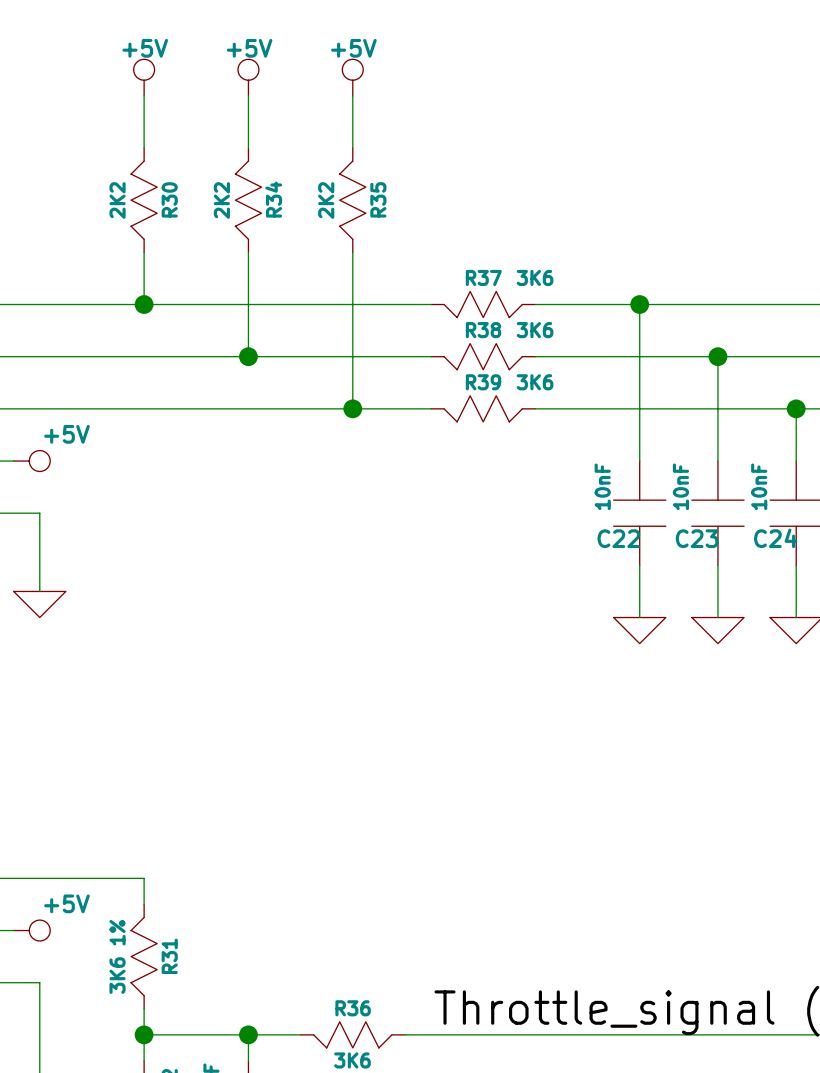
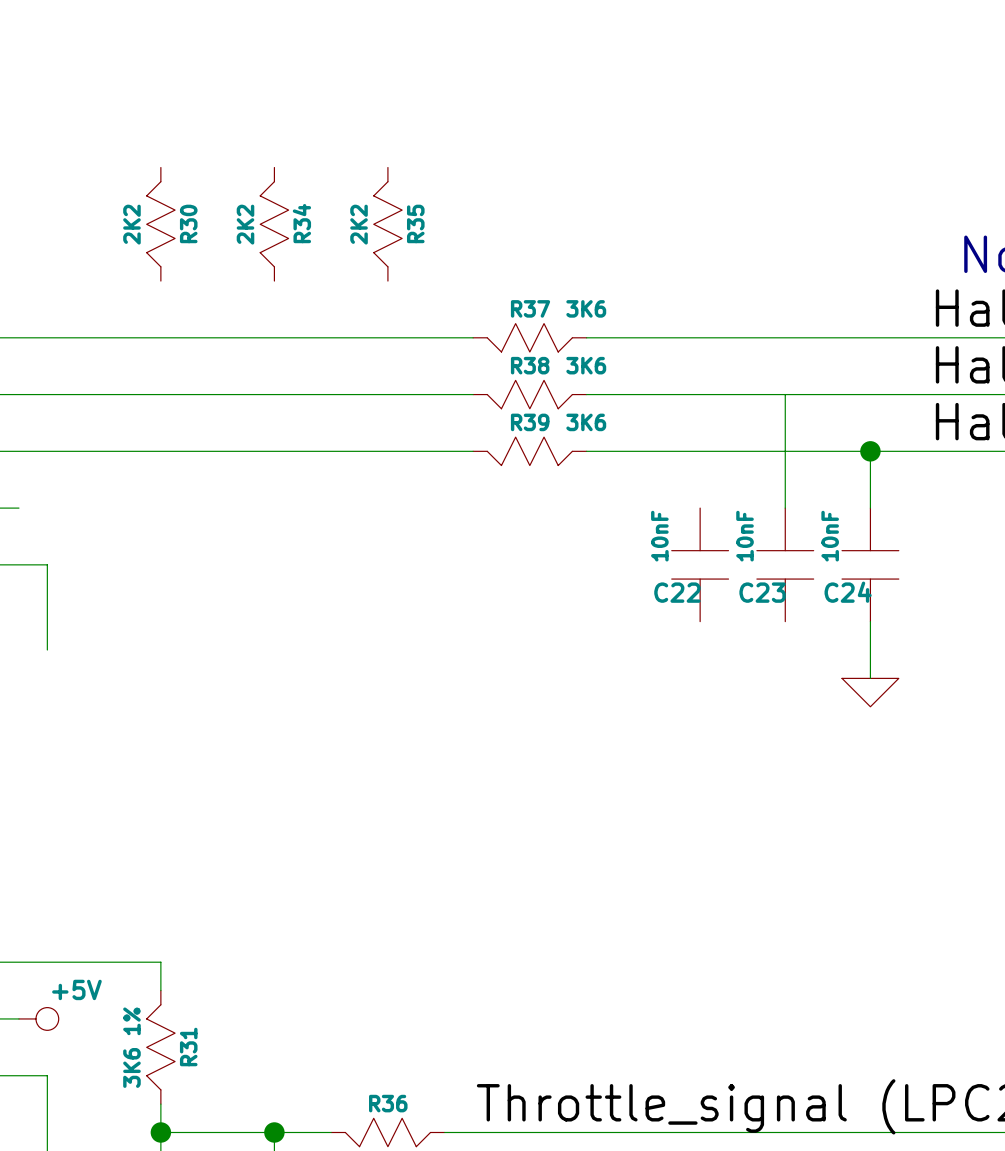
power symbol: +5V (144, 77) -> none
power symbol: +5V (248, 77) -> none
power symbol: +5V (352, 77) -> none
wire: (144, 95) (144, 148) -> none
wire: (248, 95) (248, 148) -> none
wire: (352, 95) (352, 148) -> none
wire: (144, 252) (144, 304) -> none
wire: (248, 252) (248, 356) -> none
wire: (352, 252) (352, 408) -> none
junction: (144, 304) -> none
wire: (639, 304) (639, 461) -> none
junction: (639, 304) -> none
junction: (248, 356) -> none
junction: (717, 356) -> none
junction: (352, 408) -> none
power symbol: +5V (31, 461) -> none
wire: (639, 565) (639, 617) -> none
wire: (717, 565) (717, 617) -> none
power symbol: (39, 604) -> none
power symbol: (639, 630) -> none
power symbol: (717, 630) -> none

